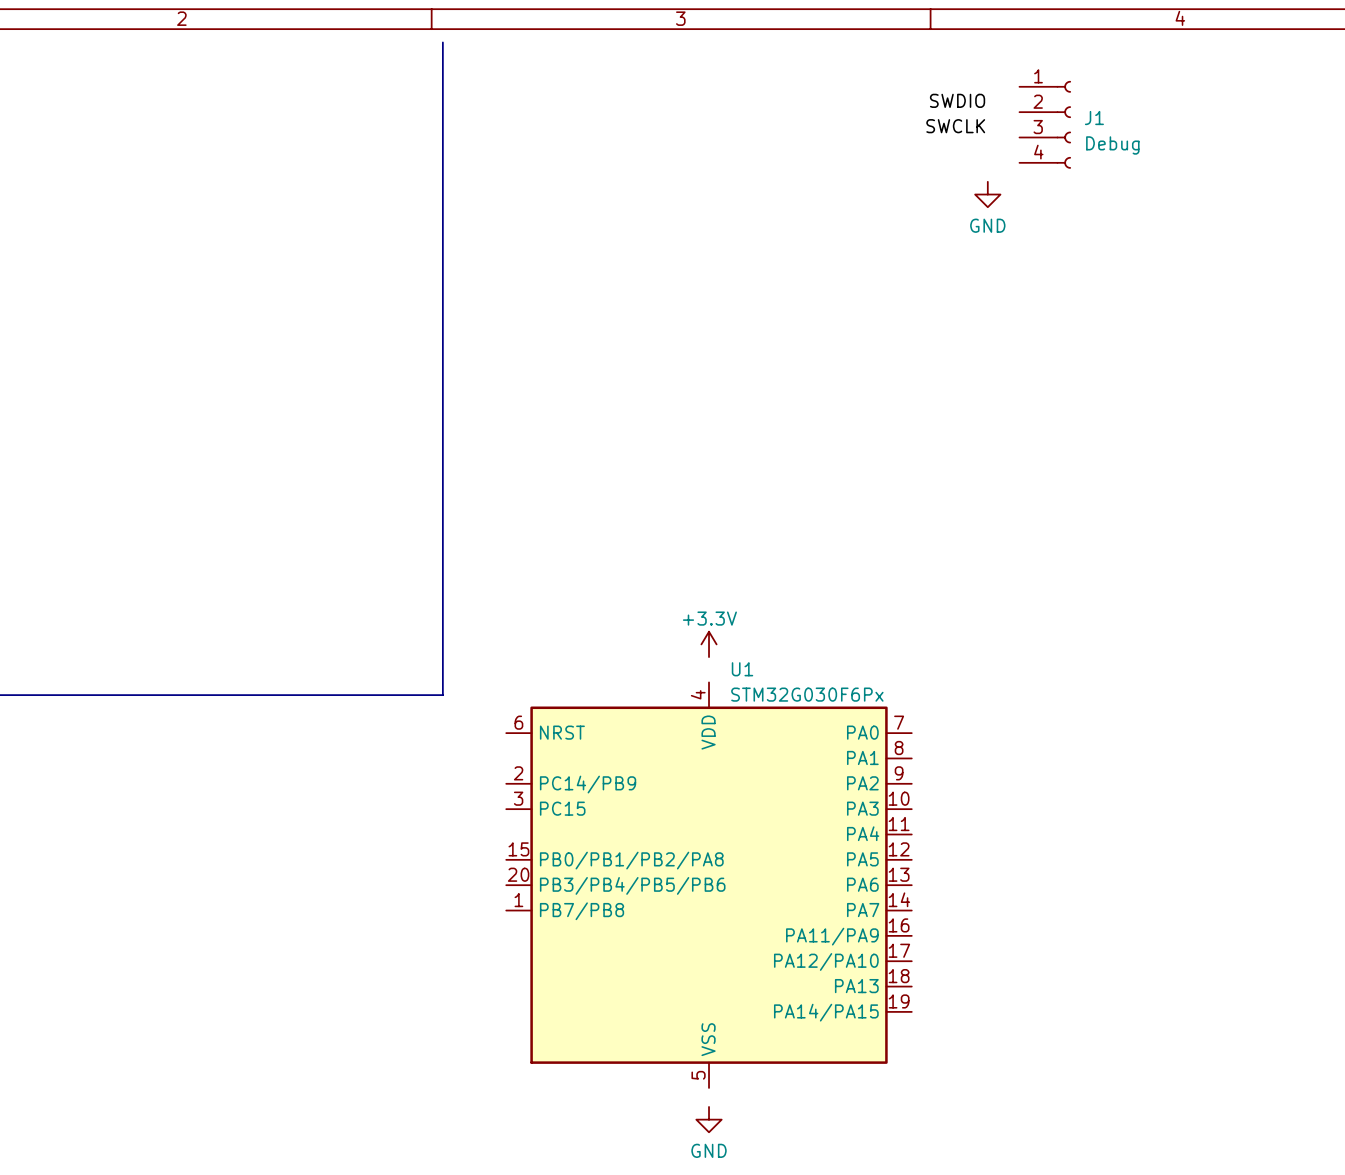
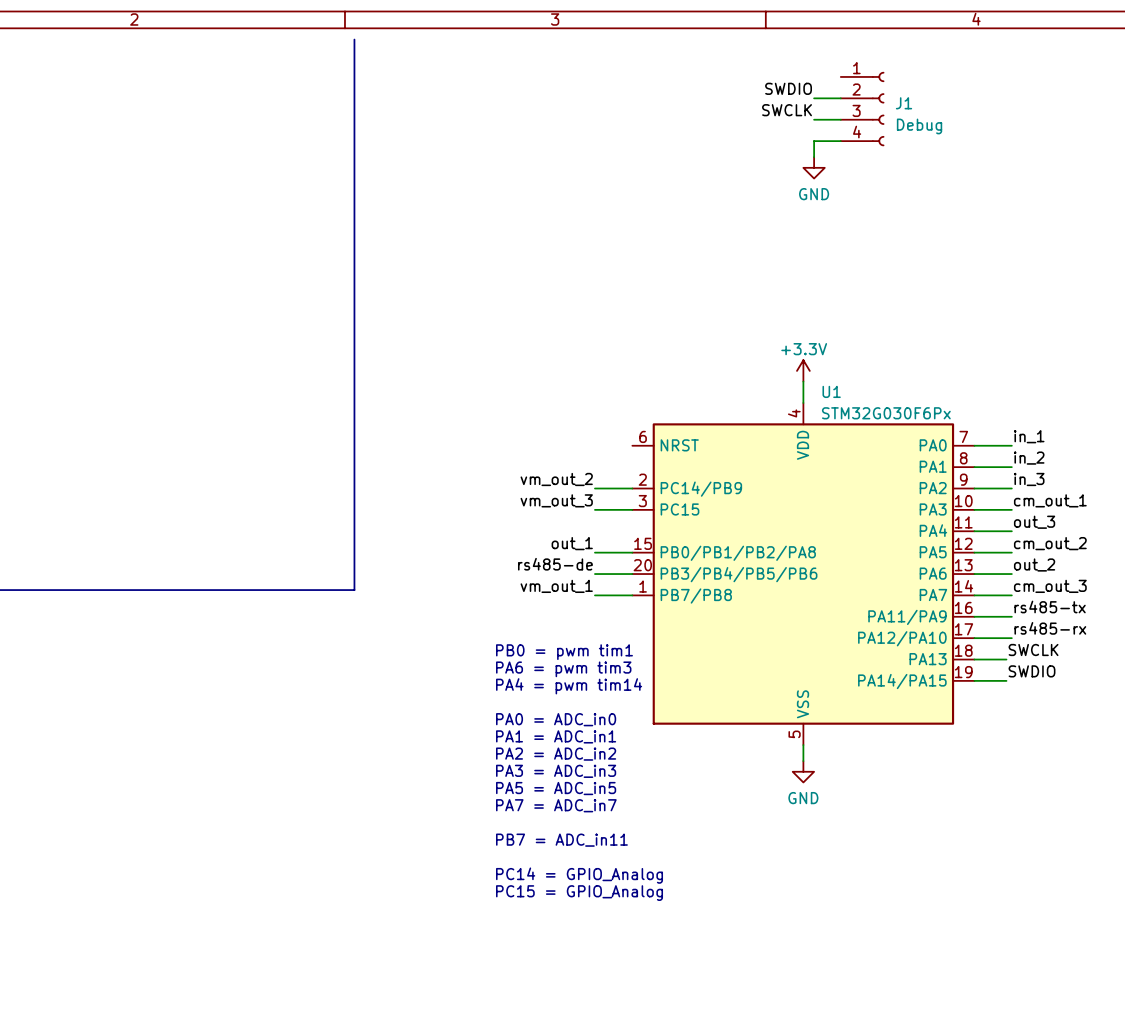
wire: none -> (814, 98) (840, 98)
wire: none -> (814, 119) (840, 119)
wire: none -> (840, 141) (814, 141) (814, 157)
power symbol: none -> +3.3V (803, 370)
wire: none -> (803, 381) (803, 402)
label: none -> in_1 (1029, 436)
wire: none -> (974, 445) (1011, 445)
label: none -> in_2 (1029, 458)
wire: none -> (974, 467) (1011, 467)
label: none -> vm_out_2 (556, 479)
label: none -> in_3 (1029, 479)
wire: none -> (594, 488) (632, 488)
wire: none -> (974, 488) (1011, 488)
label: none -> vm_out_3 (556, 500)
label: none -> cm_out_1 (1050, 500)
wire: none -> (594, 509) (632, 509)
wire: none -> (974, 509) (1011, 509)
label: none -> out_3 (1034, 522)
wire: none -> (974, 531) (1011, 531)
label: none -> out_1 (572, 543)
label: none -> cm_out_2 (1050, 543)
power symbol: +3.3V (709, 644) -> none
wire: none -> (594, 552) (632, 552)
wire: none -> (974, 552) (1011, 552)
label: none -> rs485-de (555, 564)
label: none -> out_2 (1034, 564)
wire: none -> (594, 574) (632, 574)
wire: none -> (974, 574) (1011, 574)
label: none -> vm_out_1 (556, 586)
label: none -> cm_out_3 (1050, 586)
wire: none -> (594, 595) (632, 595)
wire: none -> (974, 595) (1011, 595)
label: none -> rs485-tx (1050, 606)
wire: none -> (974, 616) (1011, 616)
label: none -> rs485-rx (1050, 628)
wire: none -> (974, 638) (1011, 638)
label: none -> SWCLK (1033, 649)
text: none -> PB0 = pwm tim1 (564, 652)
wire: none -> (974, 659) (1006, 659)
text: none -> PA6 = pwm tim3 (563, 669)
label: none -> SWDIO (1032, 671)
wire: none -> (974, 680) (1006, 680)
text: none -> PA4 = pwm tim14 (569, 686)
text: none -> PA0 = ADC_in0 (556, 719)
text: none -> PA1 = ADC_in1 (556, 736)
wire: none -> (803, 745) (803, 761)
U1 position: (709, 885) -> (803, 574)
text: none -> PA2 = ADC_in2 (556, 754)
text: none -> PA3 = ADC_in3 (556, 771)
power symbol: none -> GND (803, 771)
text: none -> PA5 = ADC_in5 (556, 788)
text: none -> PA7 = ADC_in7 (556, 805)
text: none -> PB7 = ADC_in11 (561, 840)
text: none -> PC14 = GPIO_Analog (579, 875)
text: none -> PC15 = GPIO_Analog (579, 893)
power symbol: GND (709, 1119) -> none

